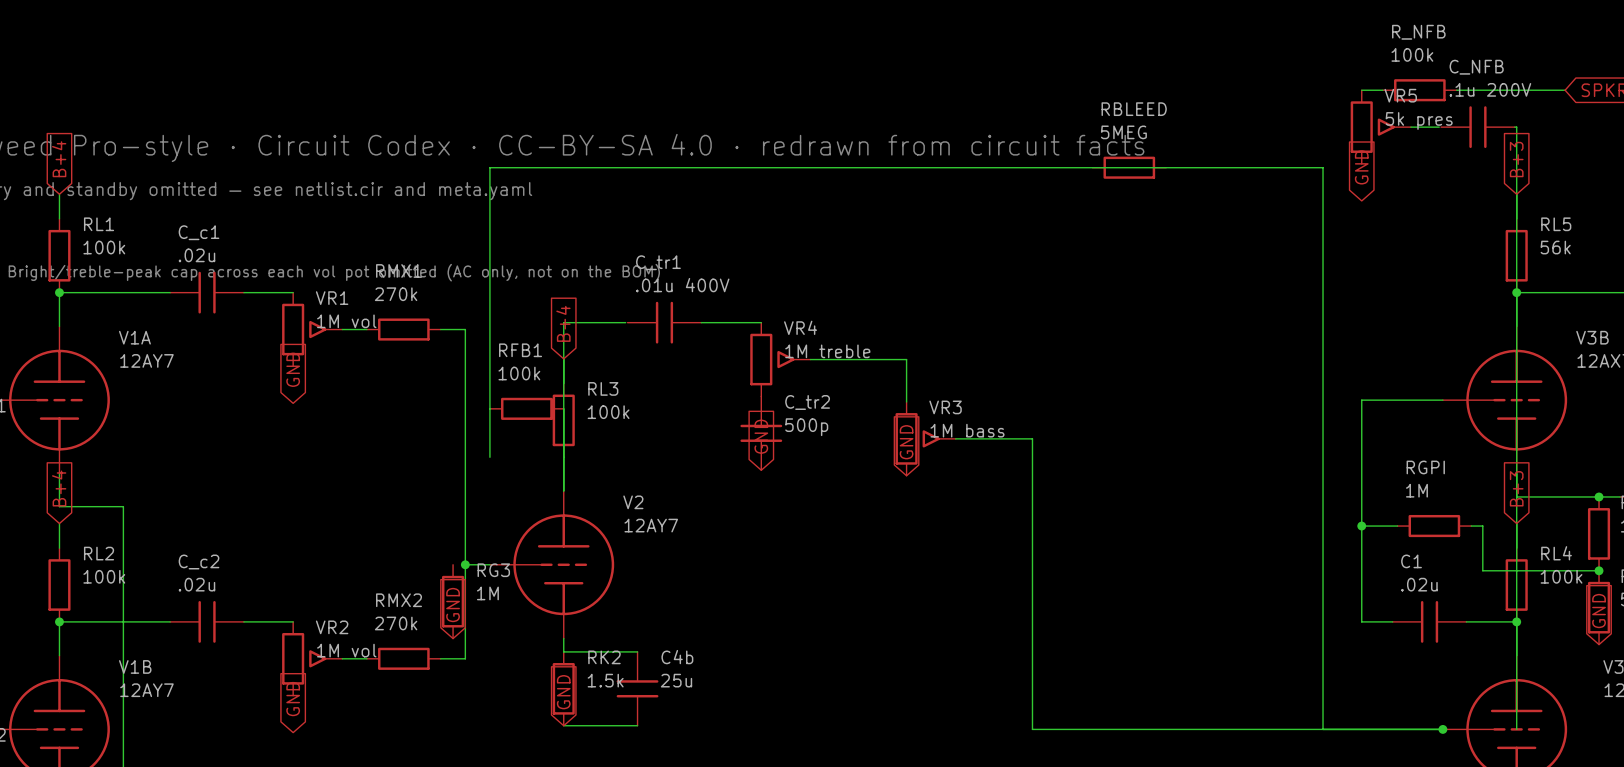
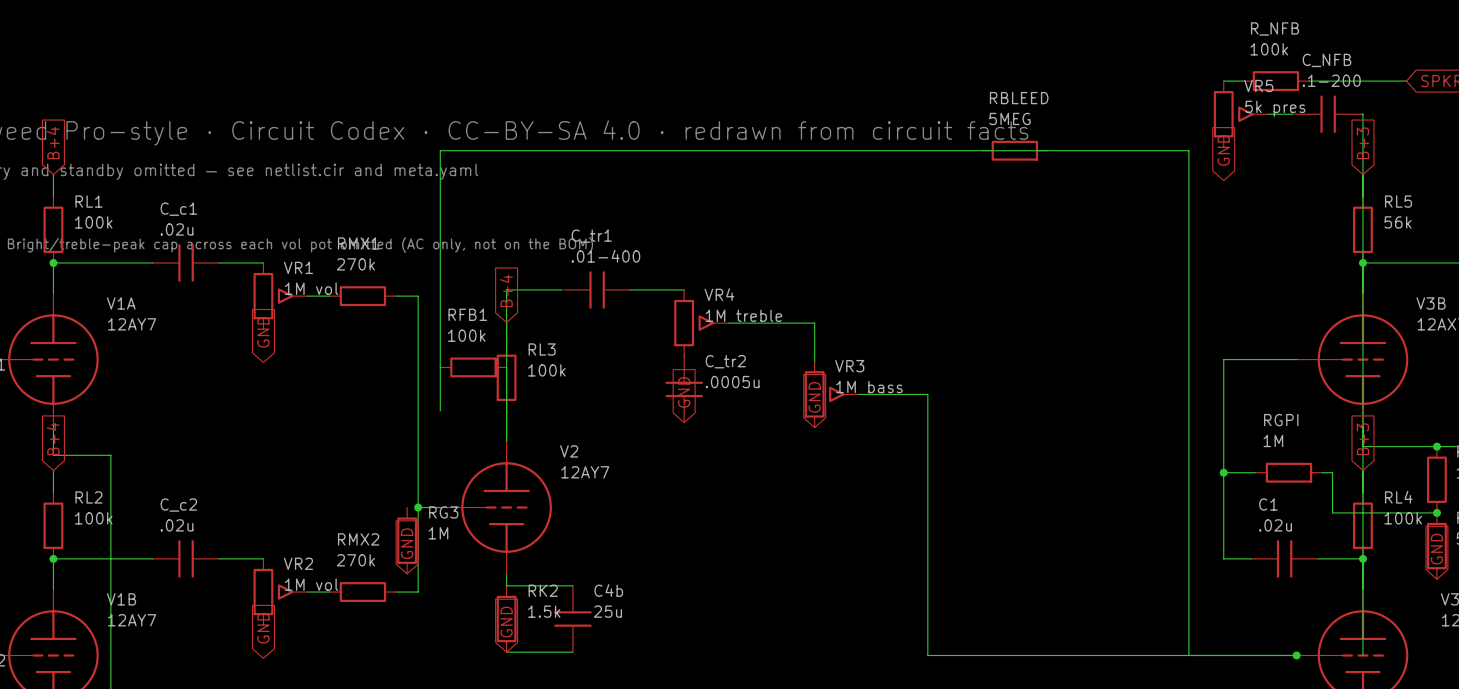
C_NFB value: .1u 200V (1490, 89) -> .1-200 (1331, 80)
C_tr1 value: .01u 400V (682, 285) -> .01-400 (605, 256)
C_tr2 value: 500p (806, 427) -> .0005u (732, 382)

